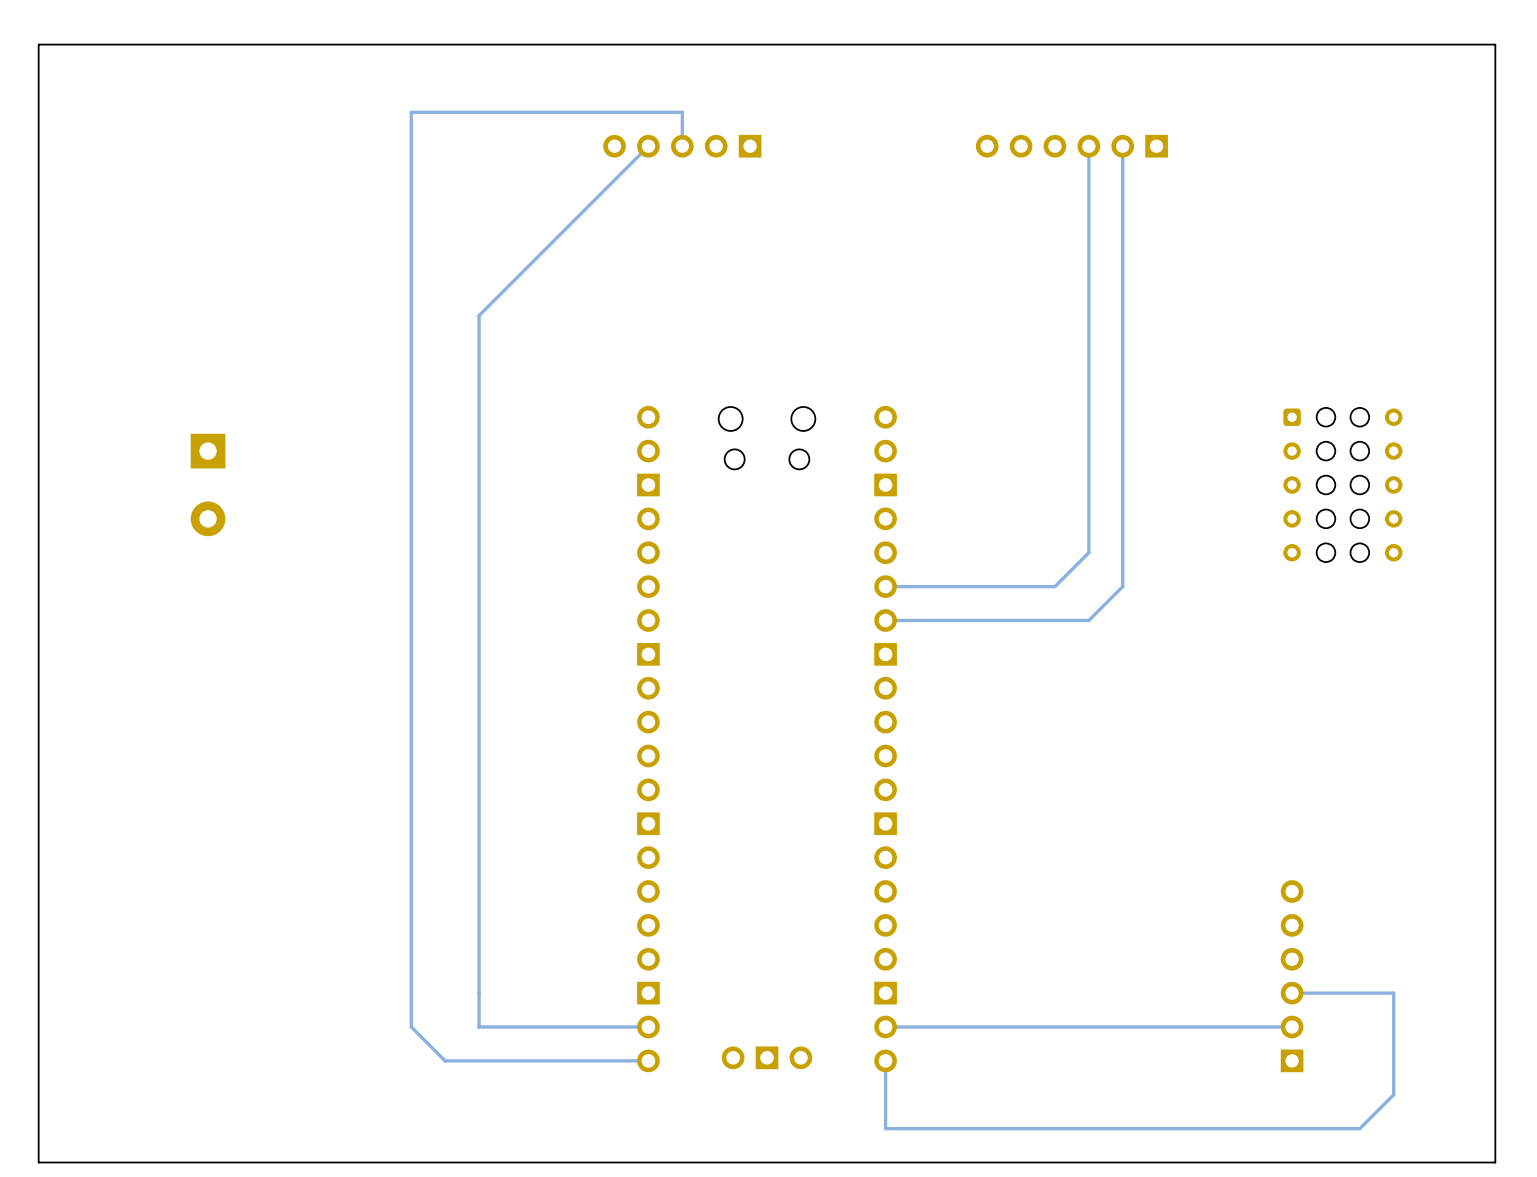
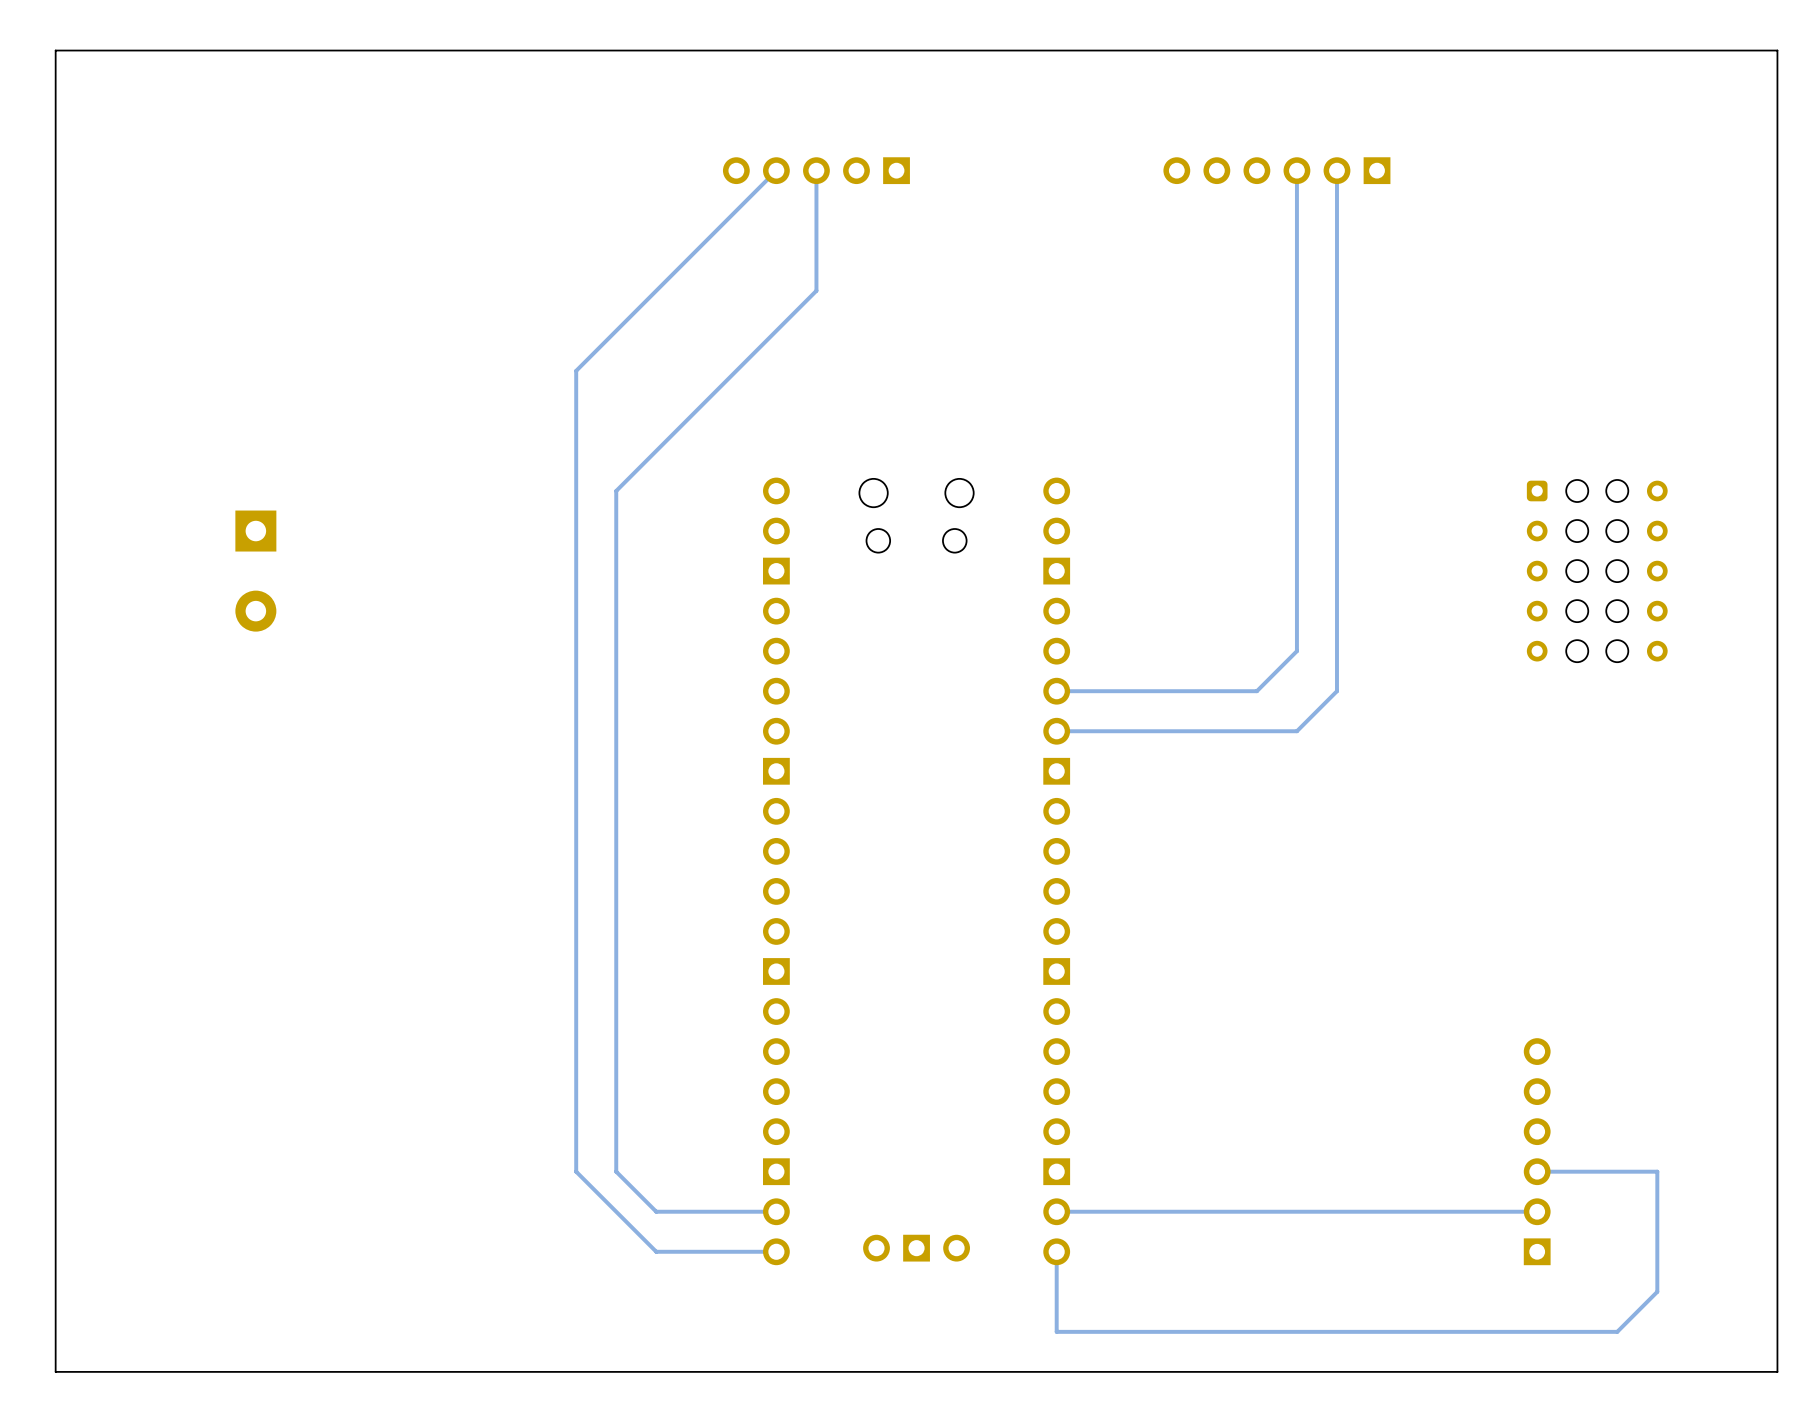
track: (682, 146) (682, 112) (411, 112) (411, 1027) (445, 1060) (546, 1060) -> (816, 170) (816, 290) (616, 490) (616, 1171) (656, 1211)
track: (479, 993) (479, 1027) (546, 1027) -> (576, 1171) (656, 1251)

